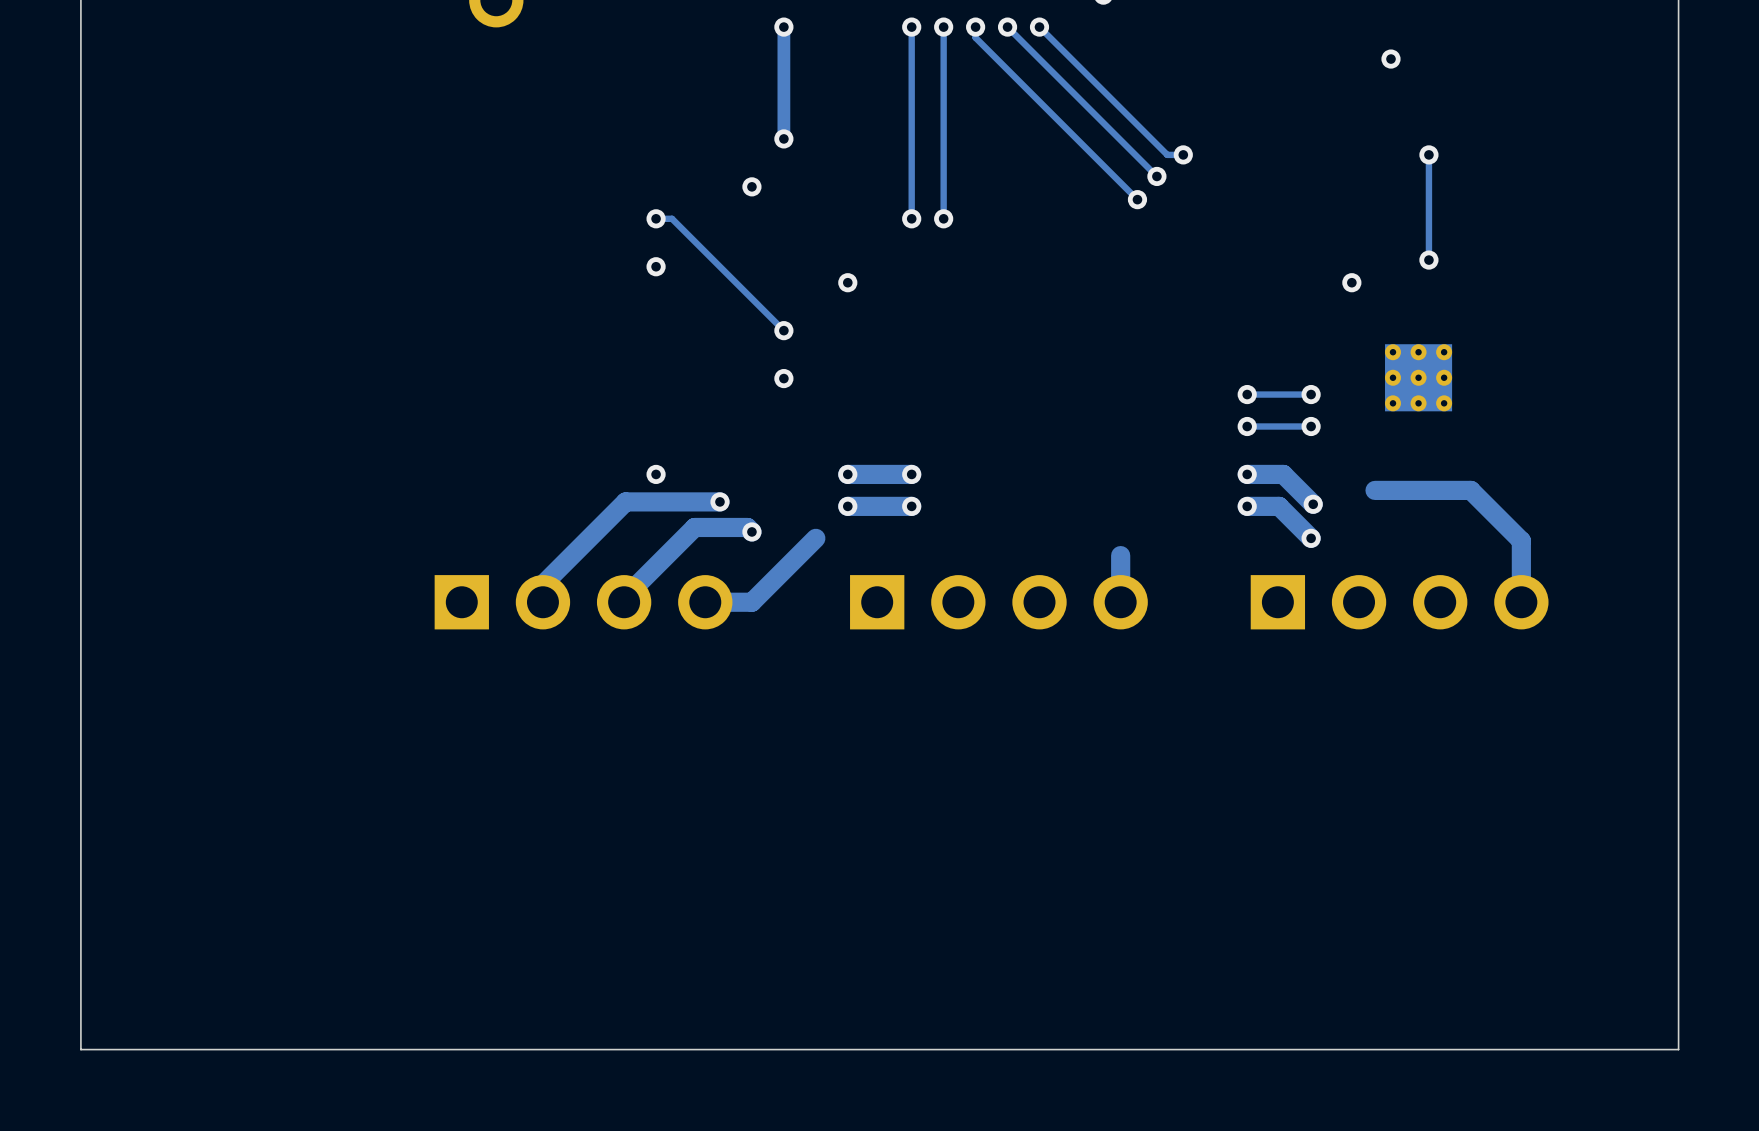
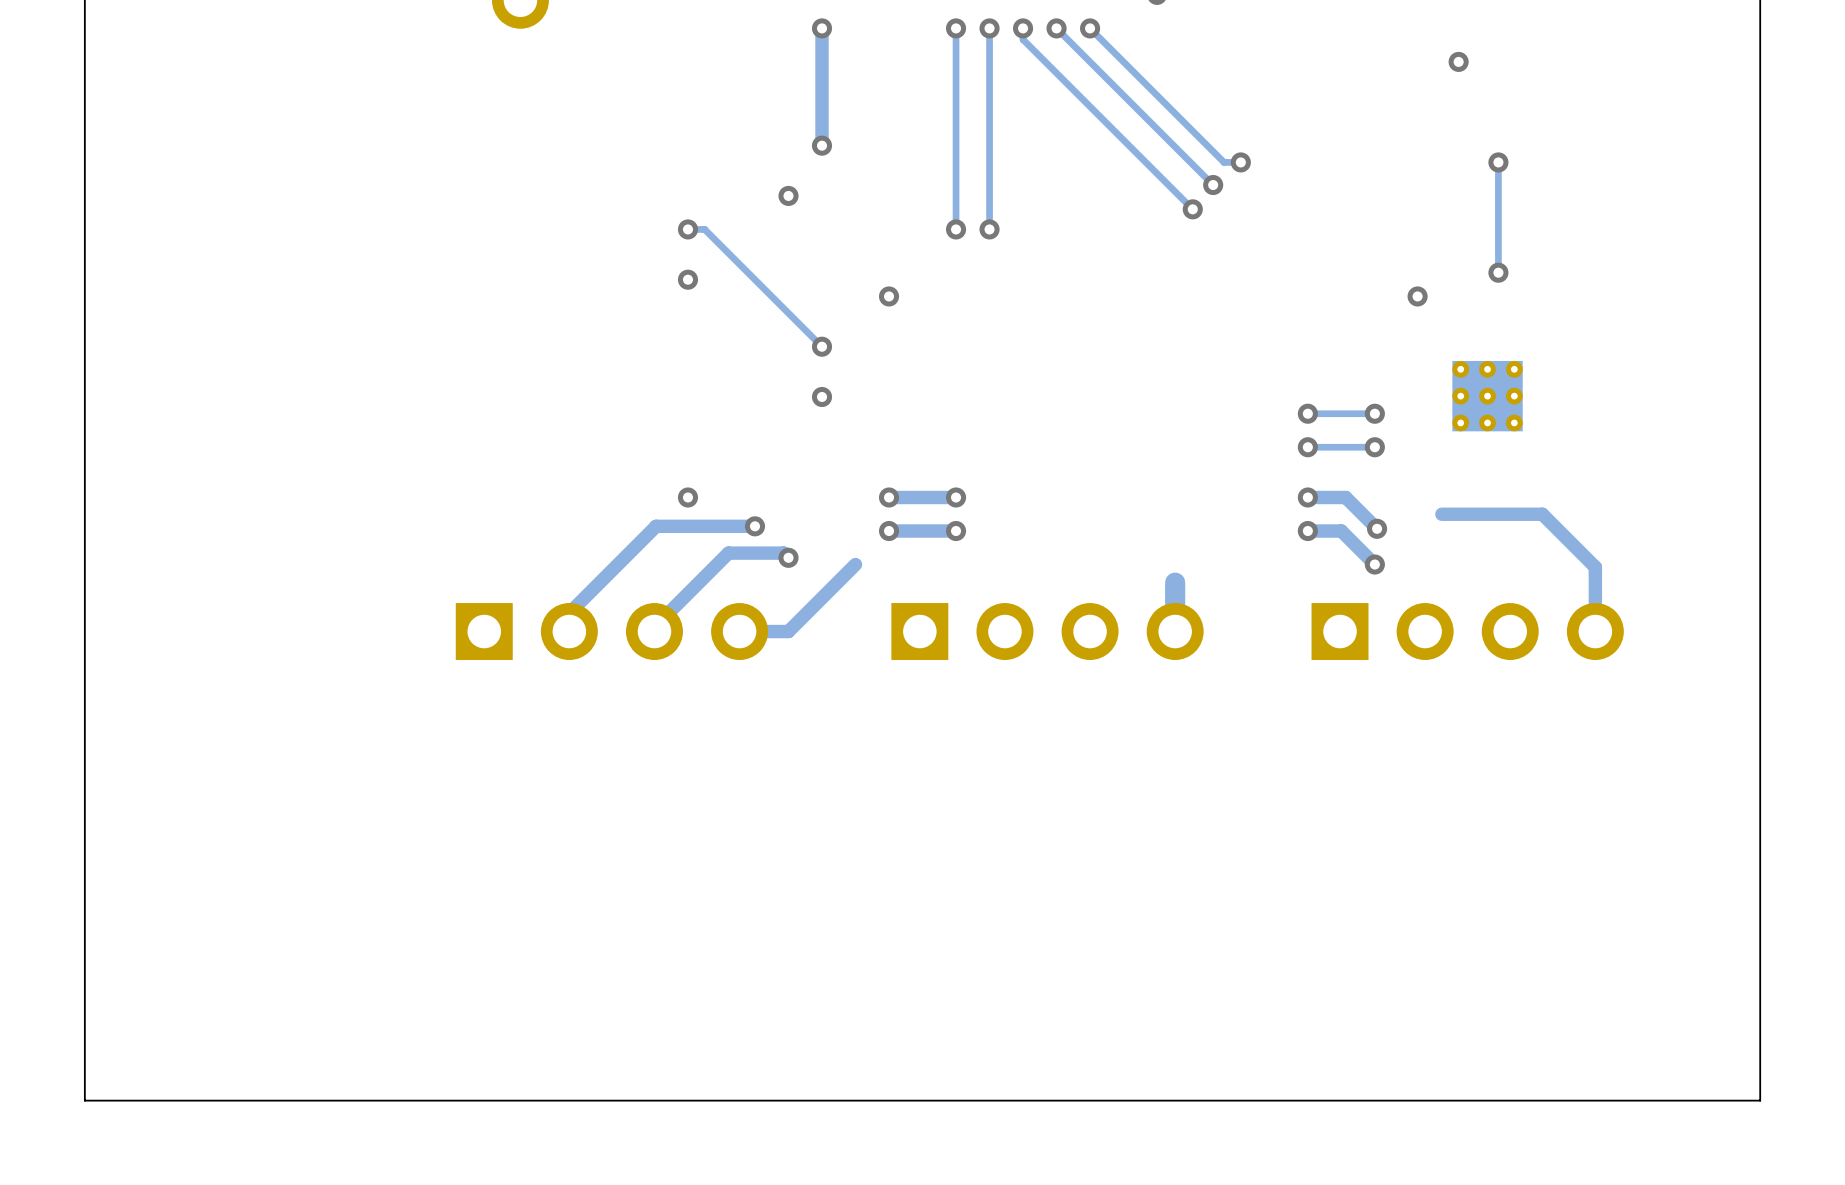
track width: thick (911, 474) (847, 474) -> thin (956, 497) (889, 497)
track width: thick (1247, 474) (1283, 474) (1313, 504) -> thin (1307, 497) (1345, 497) (1377, 528)
track width: thick (1375, 490) (1470, 490) (1521, 540) (1521, 602) -> thin (1441, 514) (1542, 514) (1595, 567) (1595, 631)
track width: thick (719, 501) (625, 501) (542, 584) -> thin (754, 526) (656, 526) (569, 613)
track width: thick (911, 506) (847, 506) -> thin (956, 531) (889, 531)
track width: thick (1247, 506) (1279, 506) (1311, 538) -> thin (1307, 531) (1341, 531) (1374, 564)
track width: thick (751, 531) (747, 527) (694, 527) (624, 598) -> thin (788, 557) (783, 553) (728, 553) (654, 627)
track width: thick (815, 538) (751, 602) (705, 602) -> thin (855, 564) (788, 631) (739, 631)

